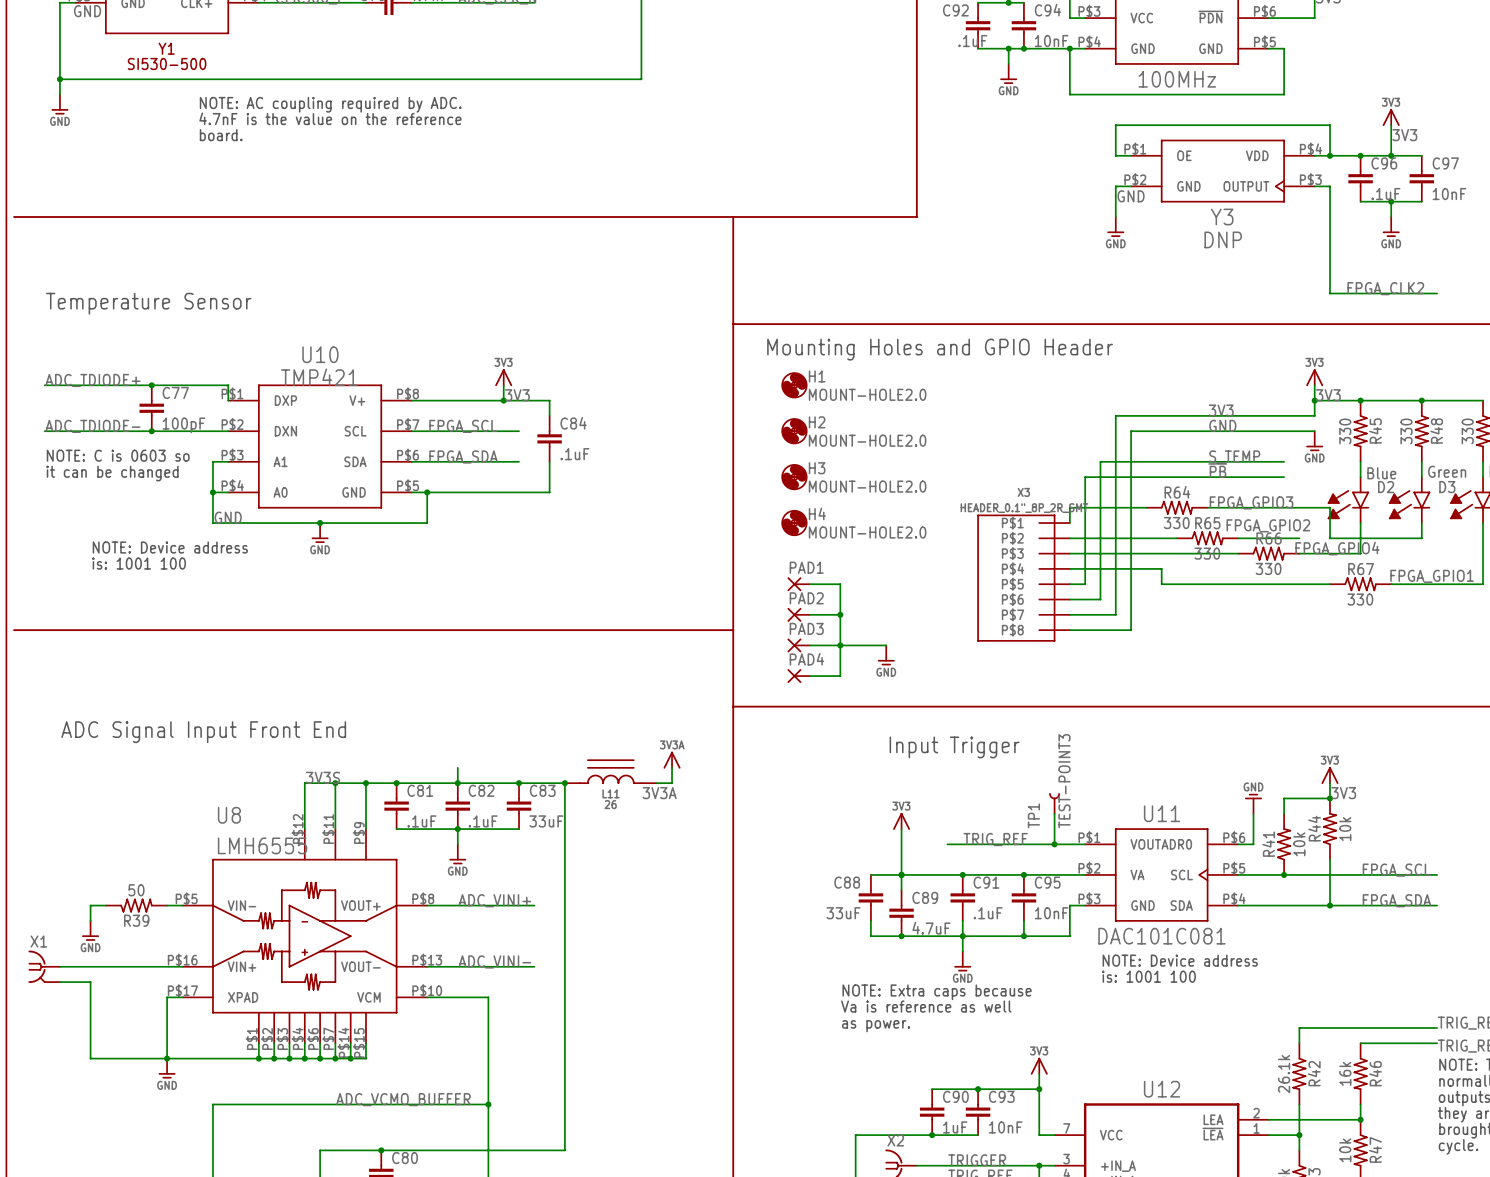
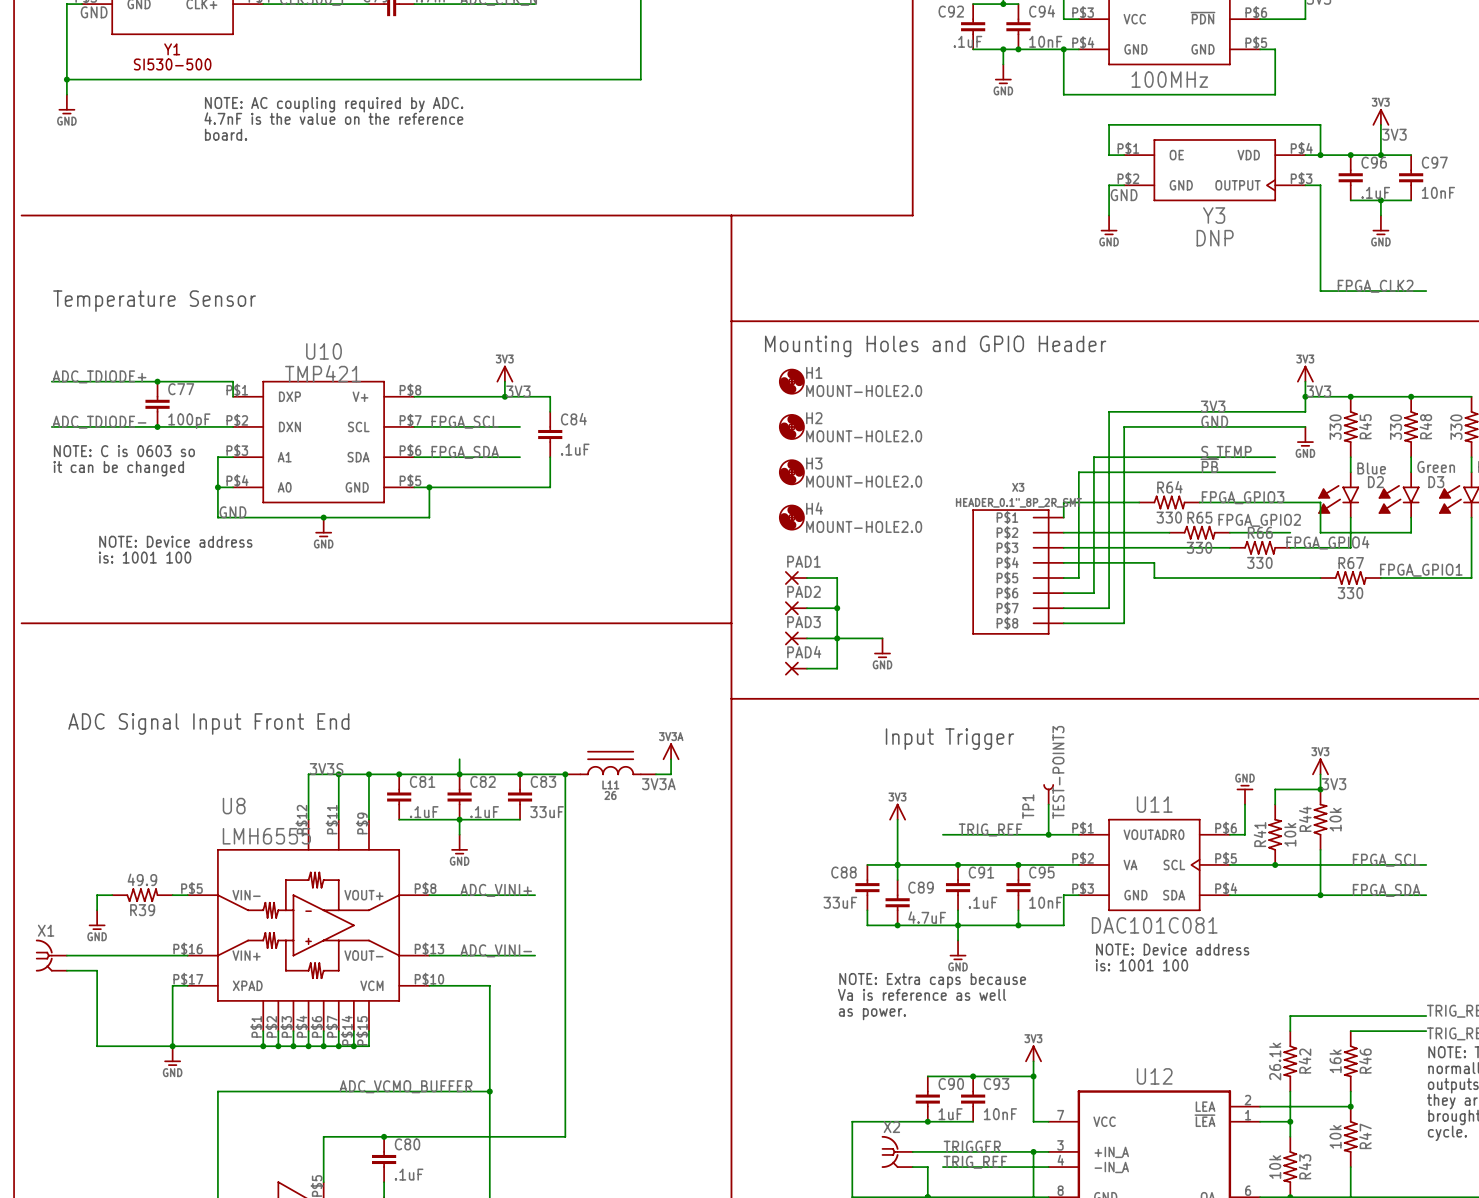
R39 value: 50 (136, 890) -> 49.9 (142, 879)

